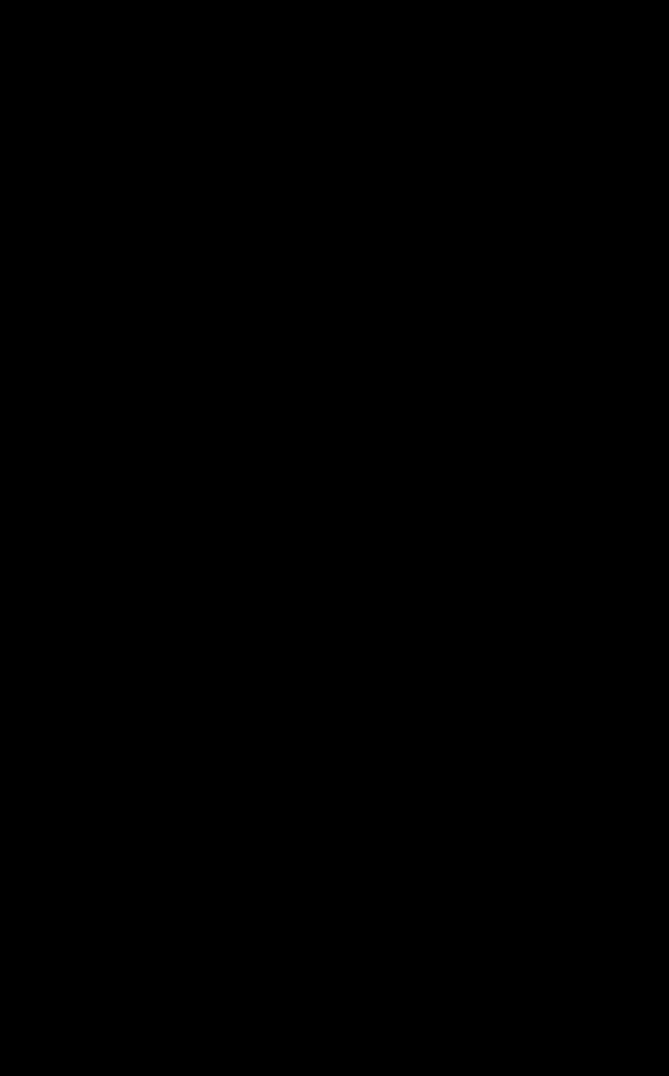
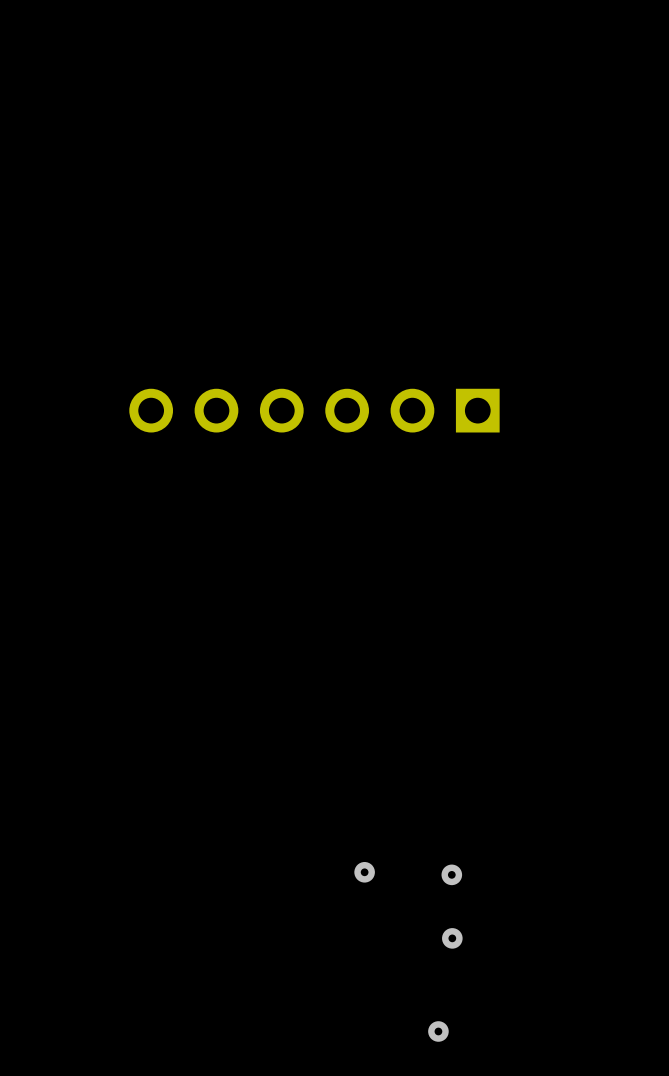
part: none -> (314, 410)
via: none -> (364, 872)
via: none -> (451, 874)
via: none -> (452, 938)
via: none -> (438, 1031)

